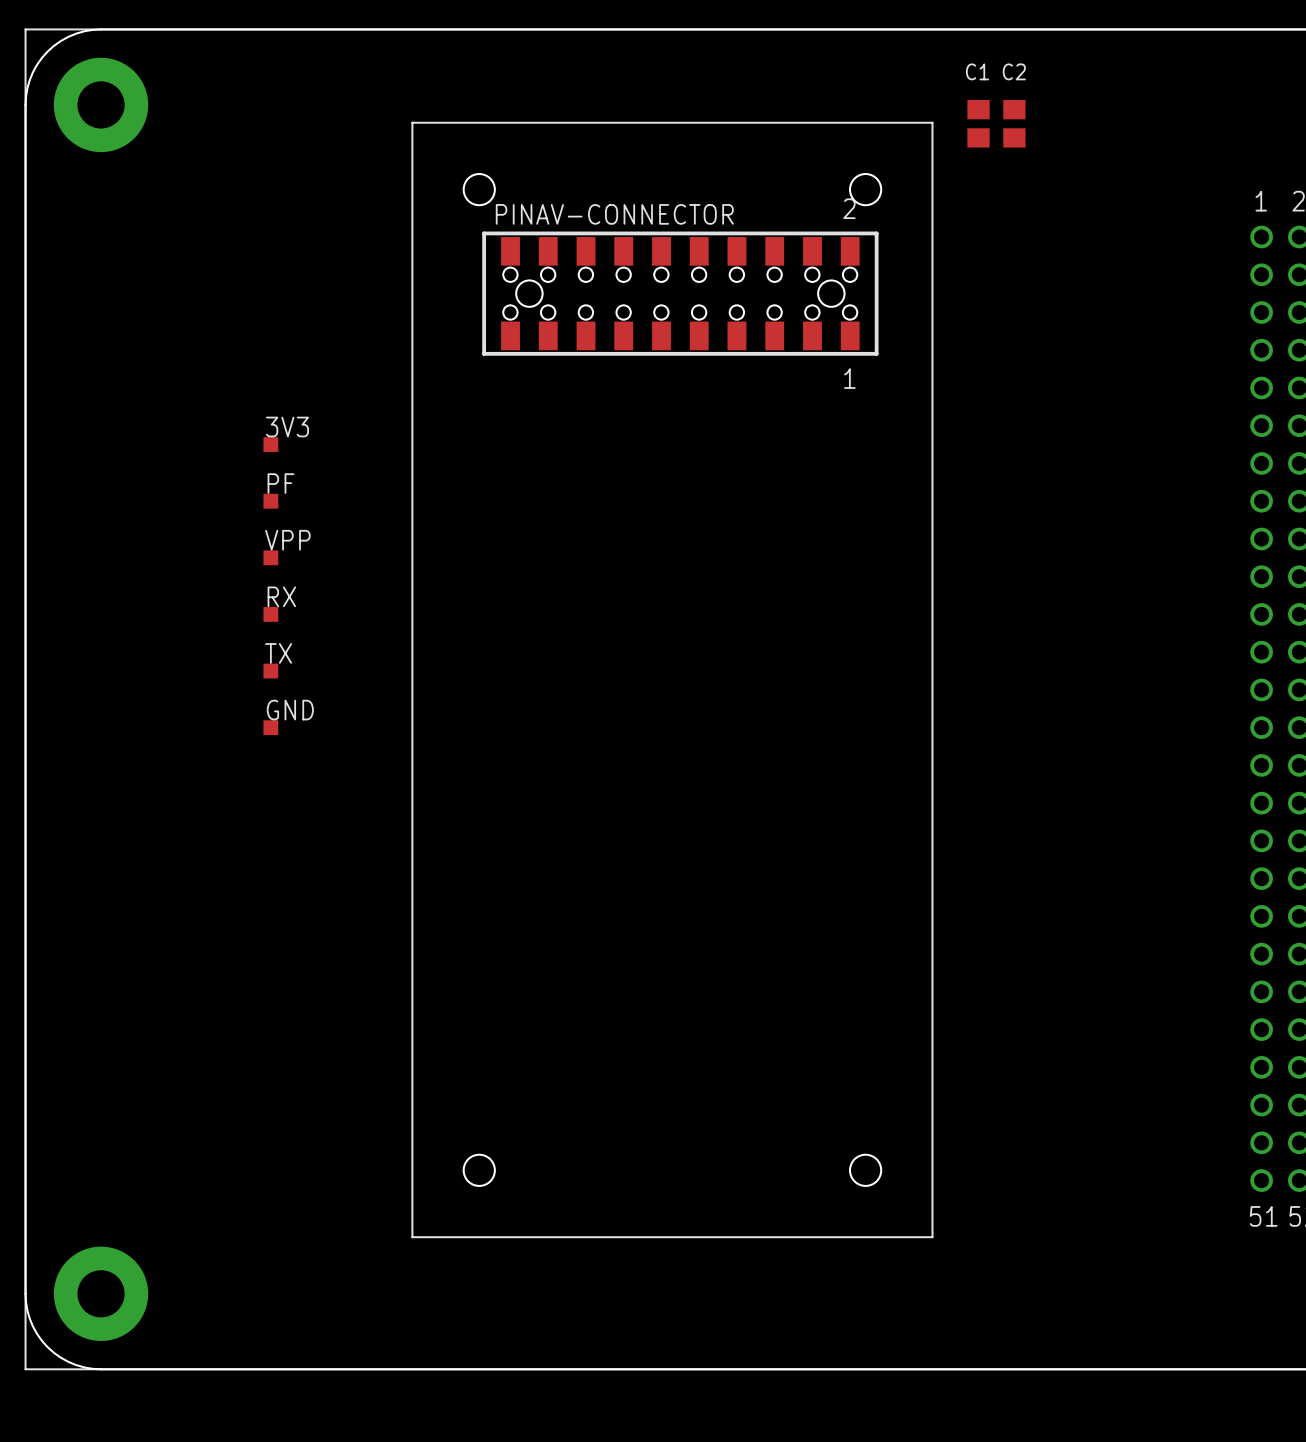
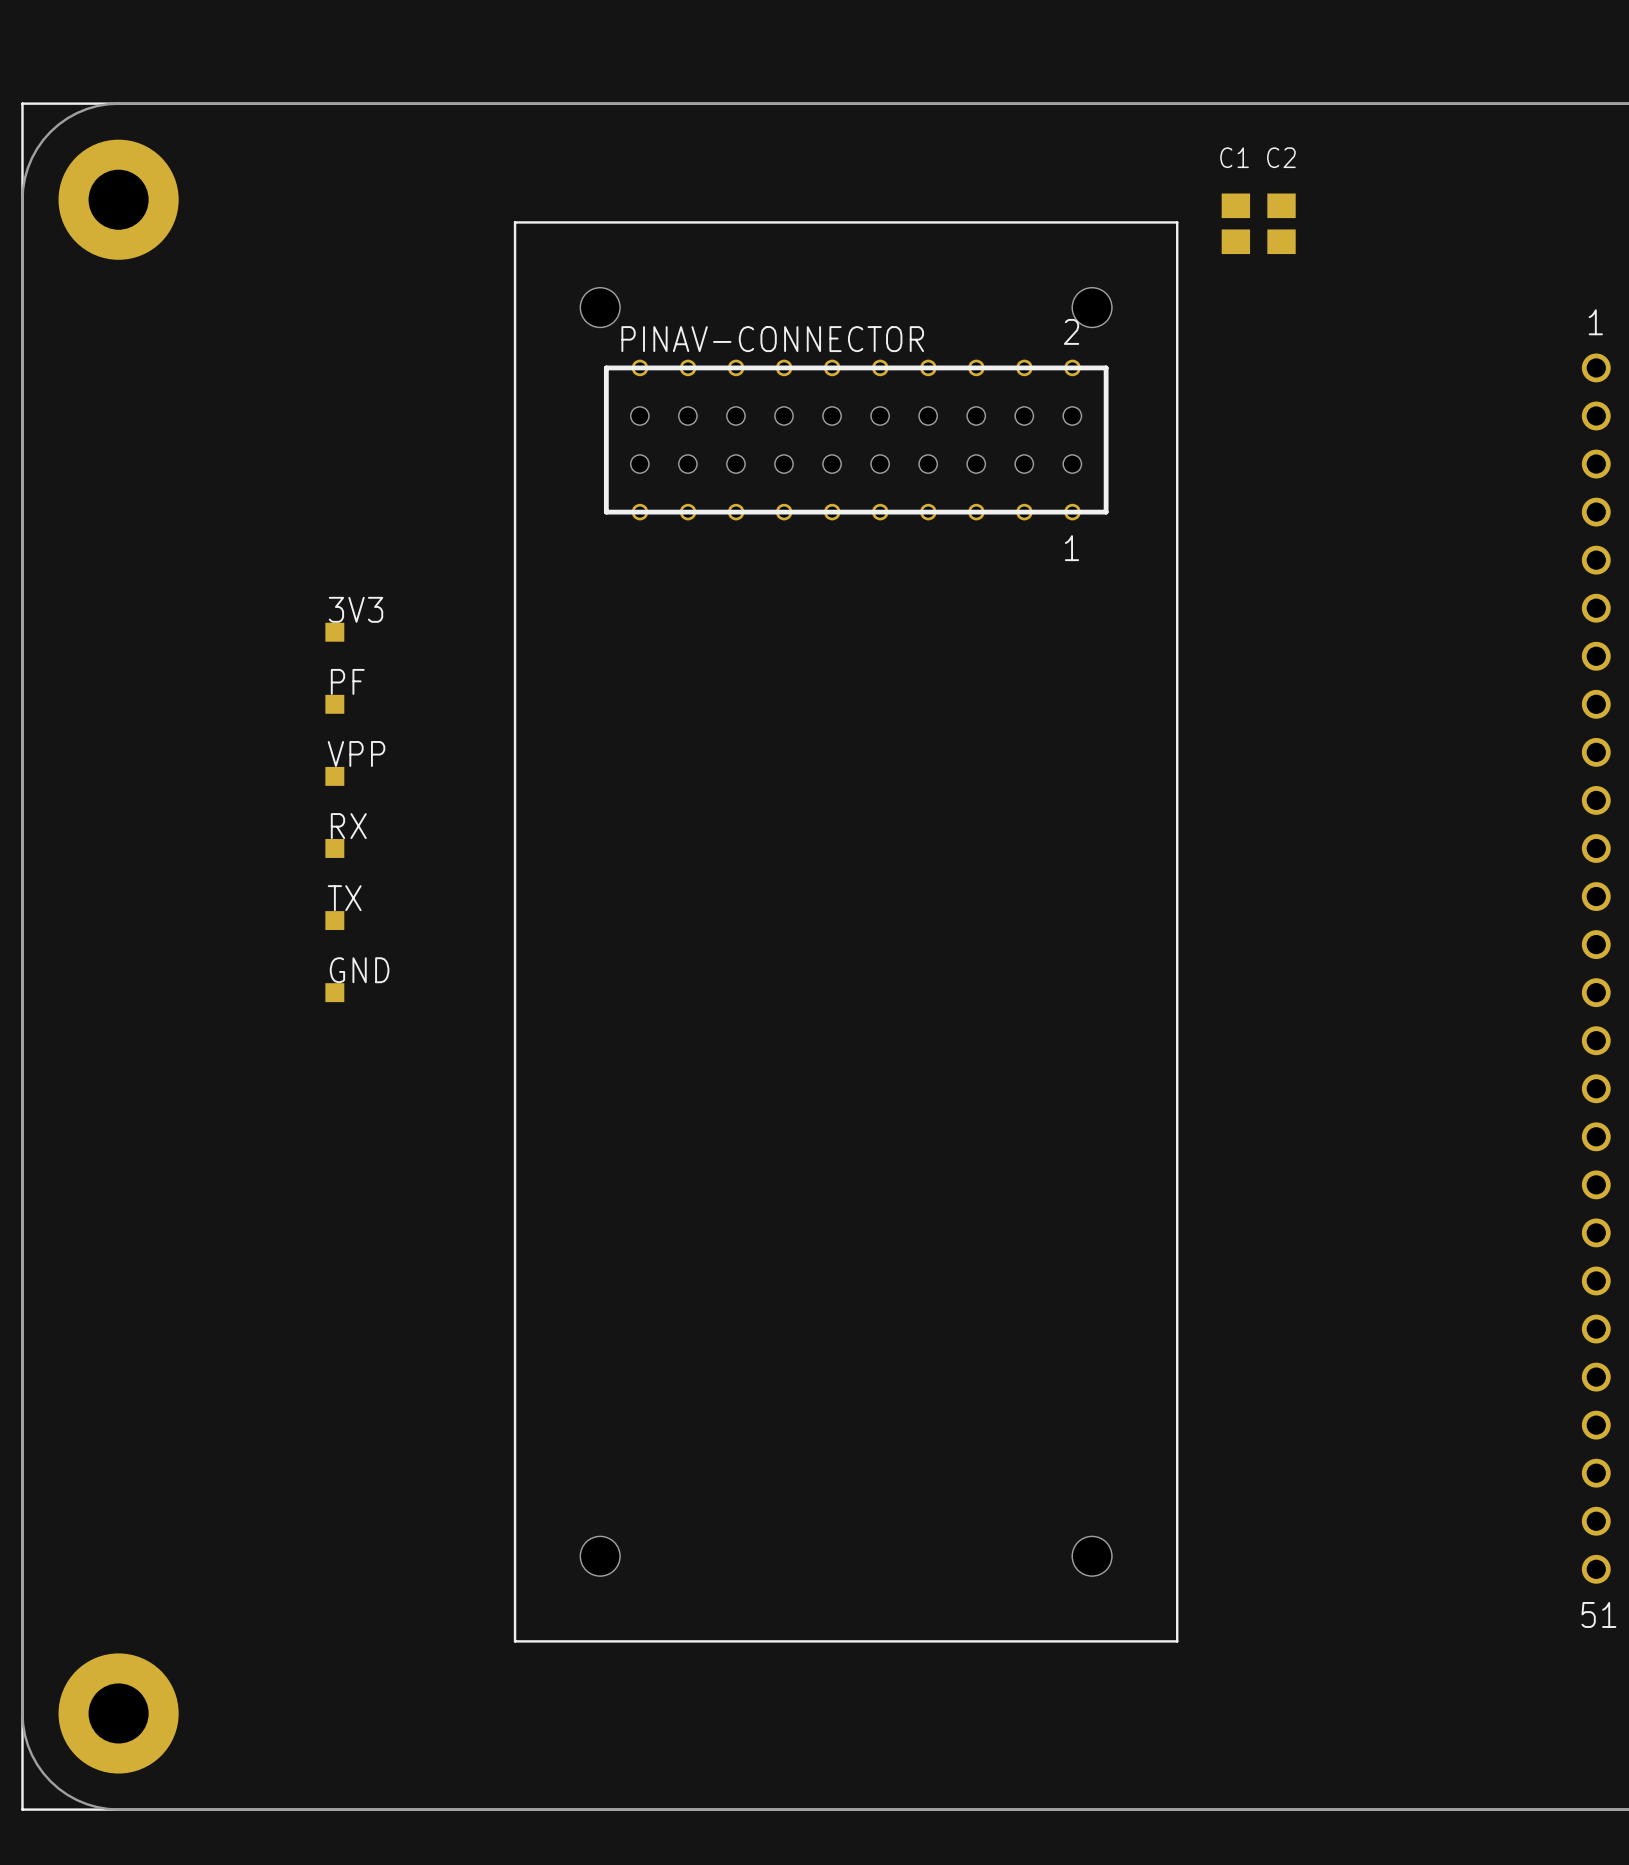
PINAV-CONNECTOR footprint: [482, 231, 879, 356] -> [603, 359, 1109, 521]

